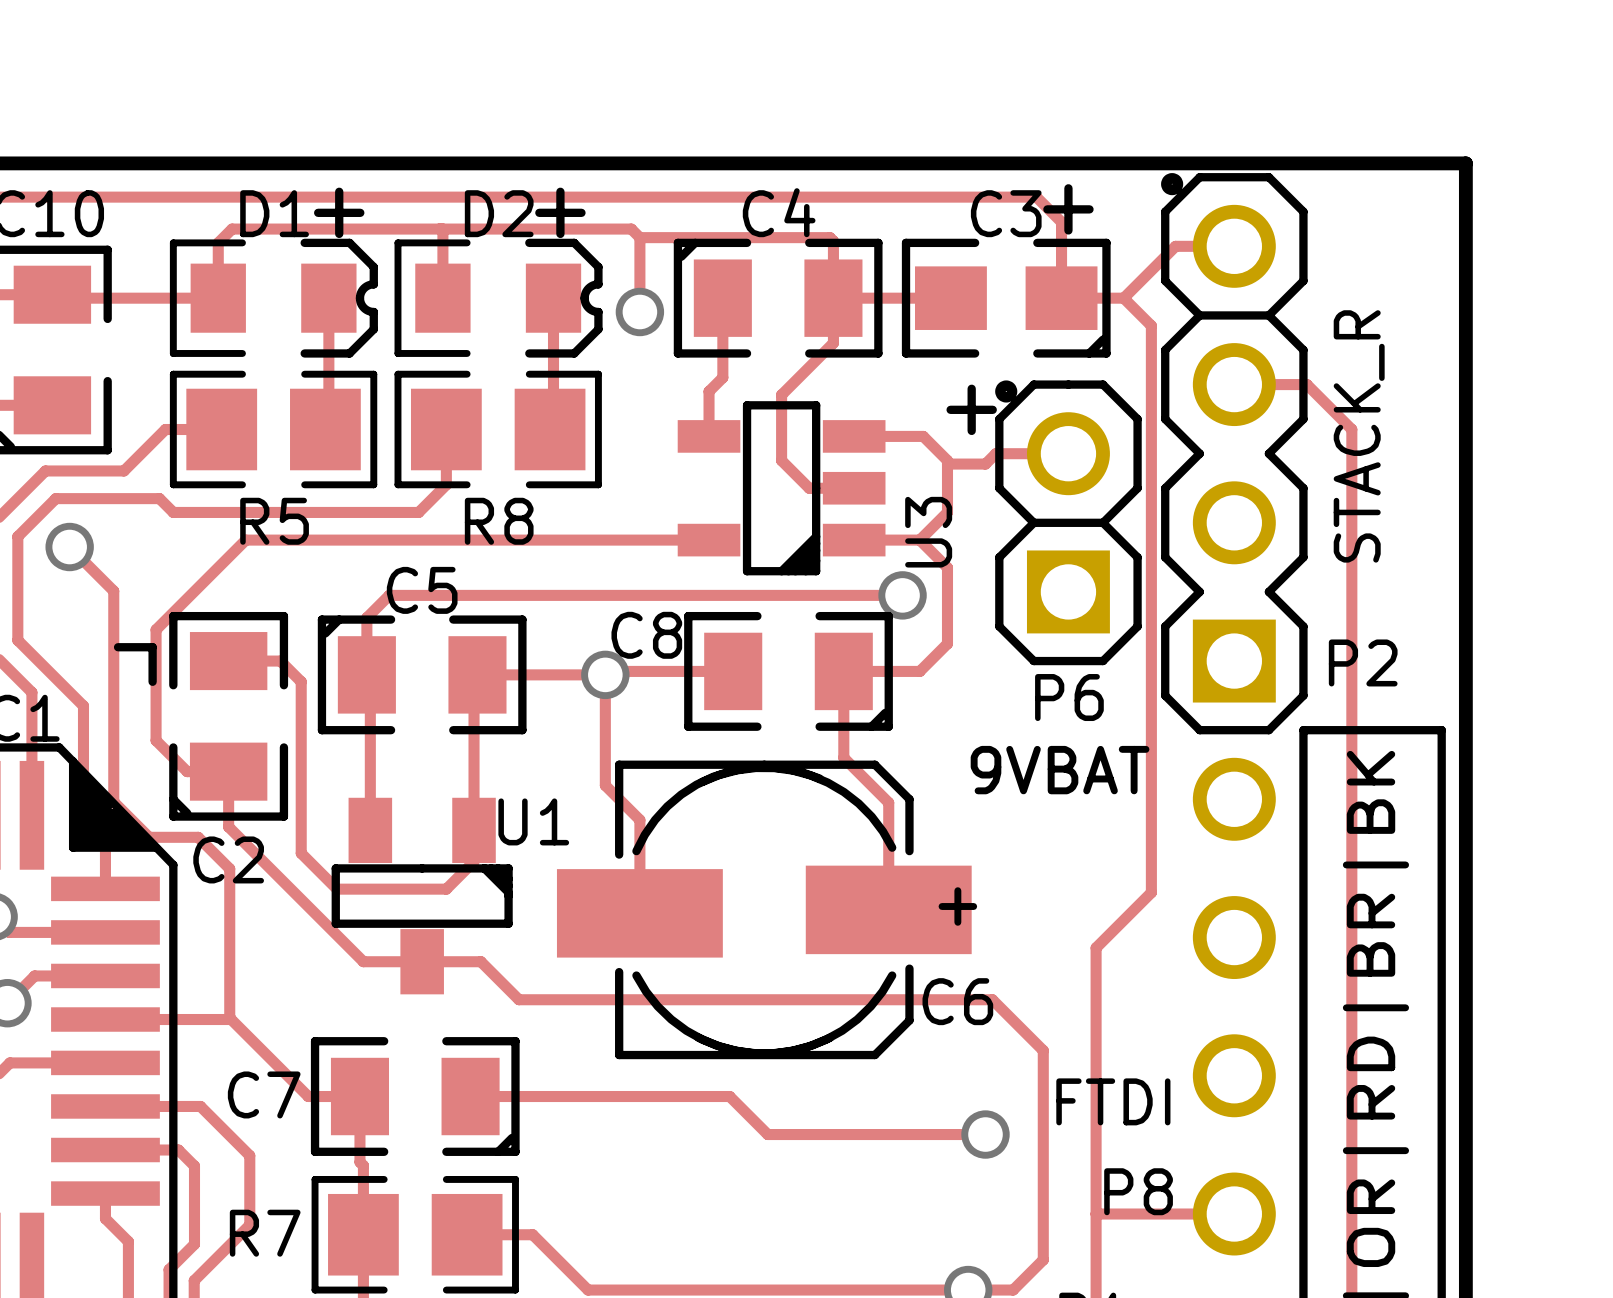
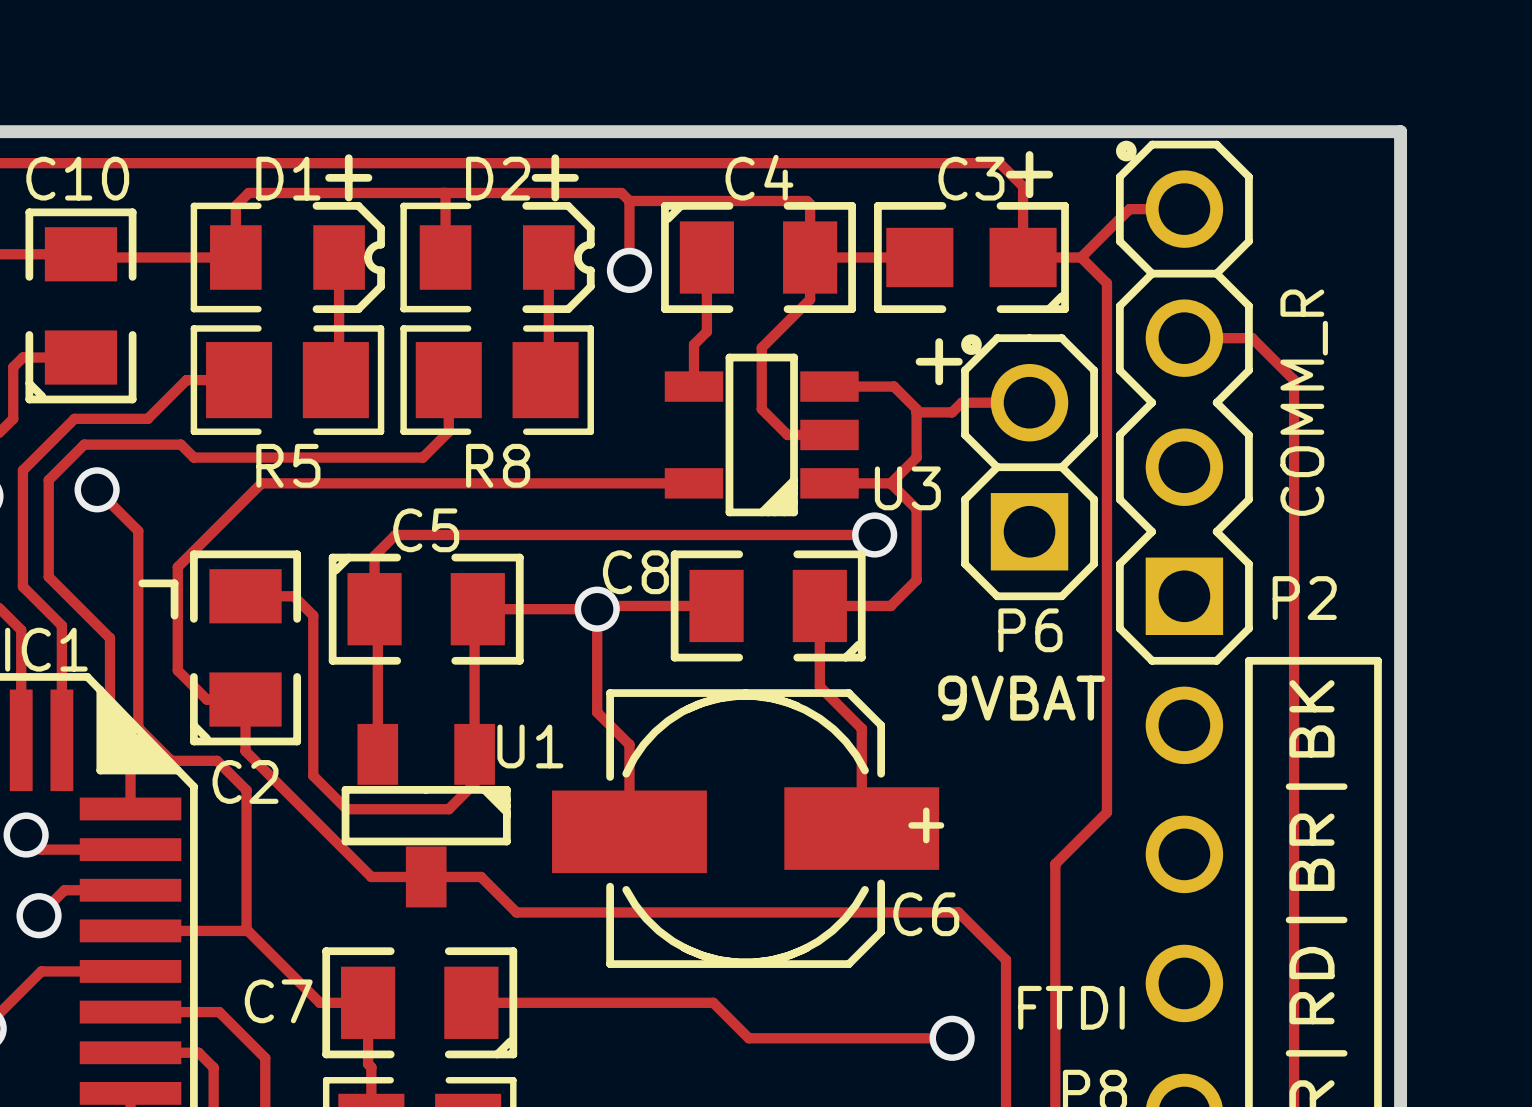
P6 value: STACK_R (1359, 436) -> none
P2 value: none -> COMM_R (1304, 402)
U3 name rotation: 0° (928, 532) -> 90° clockwise (907, 488)

